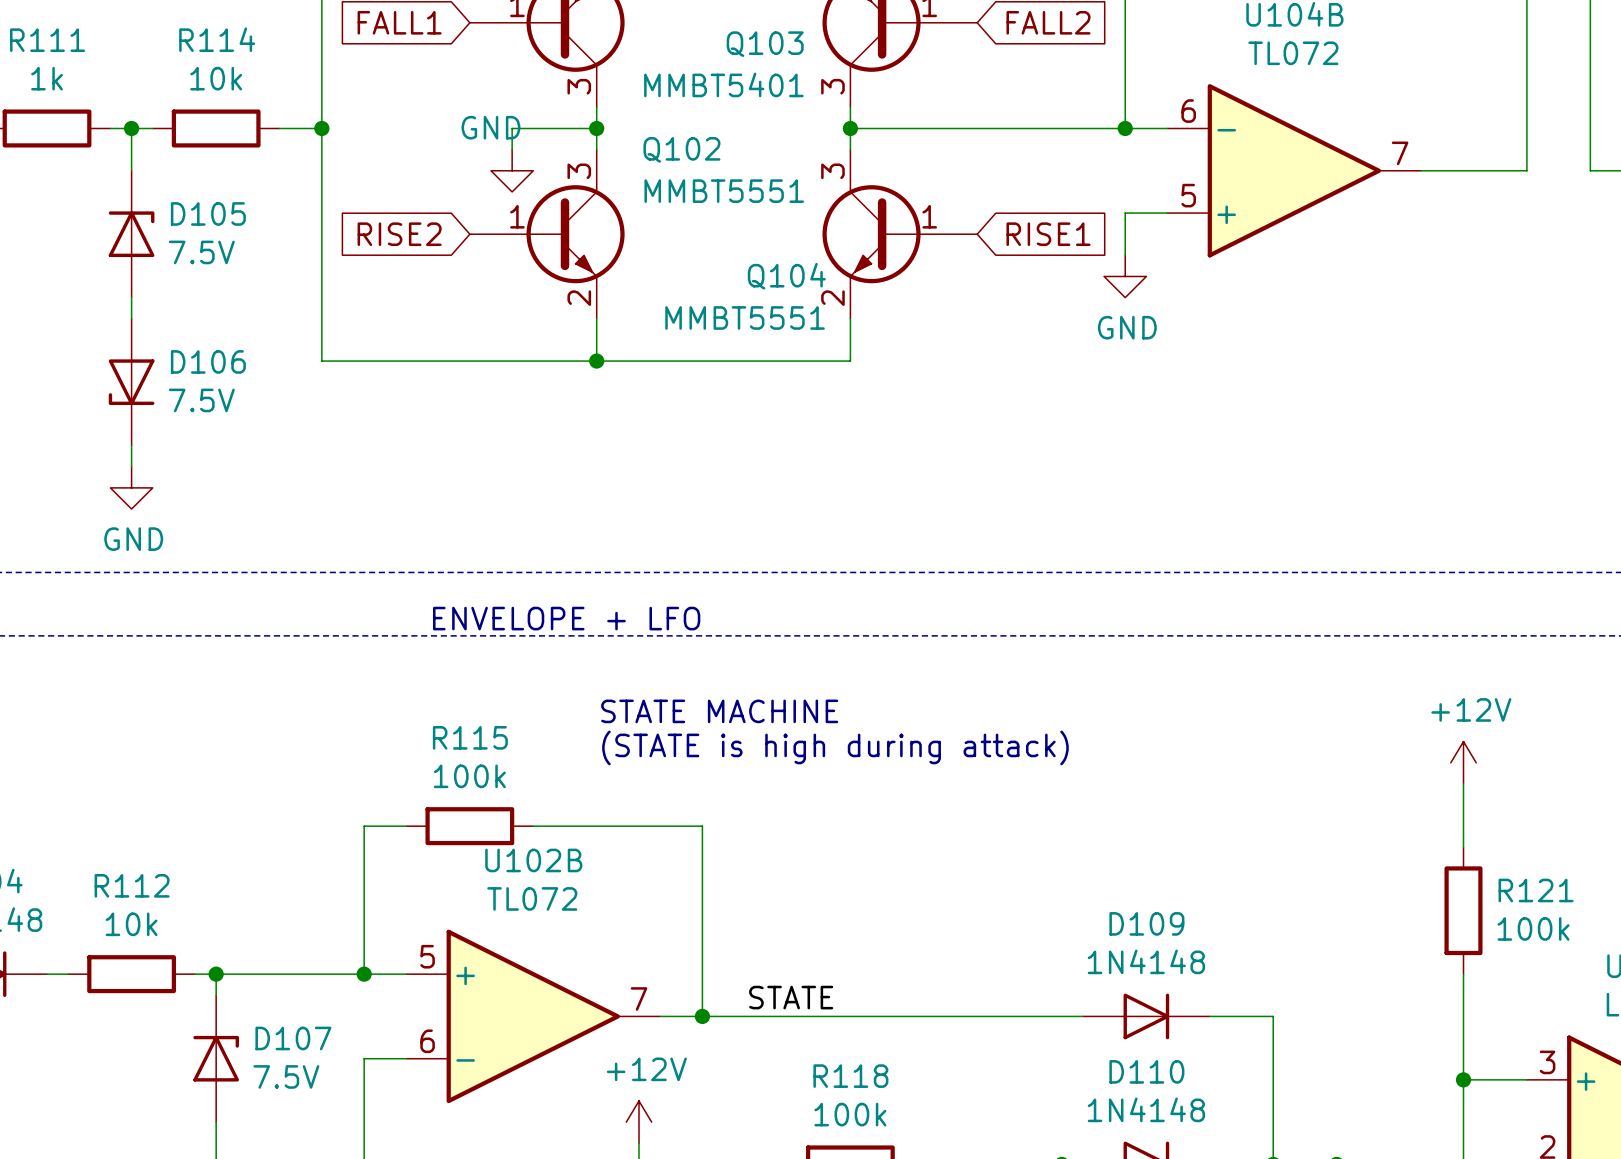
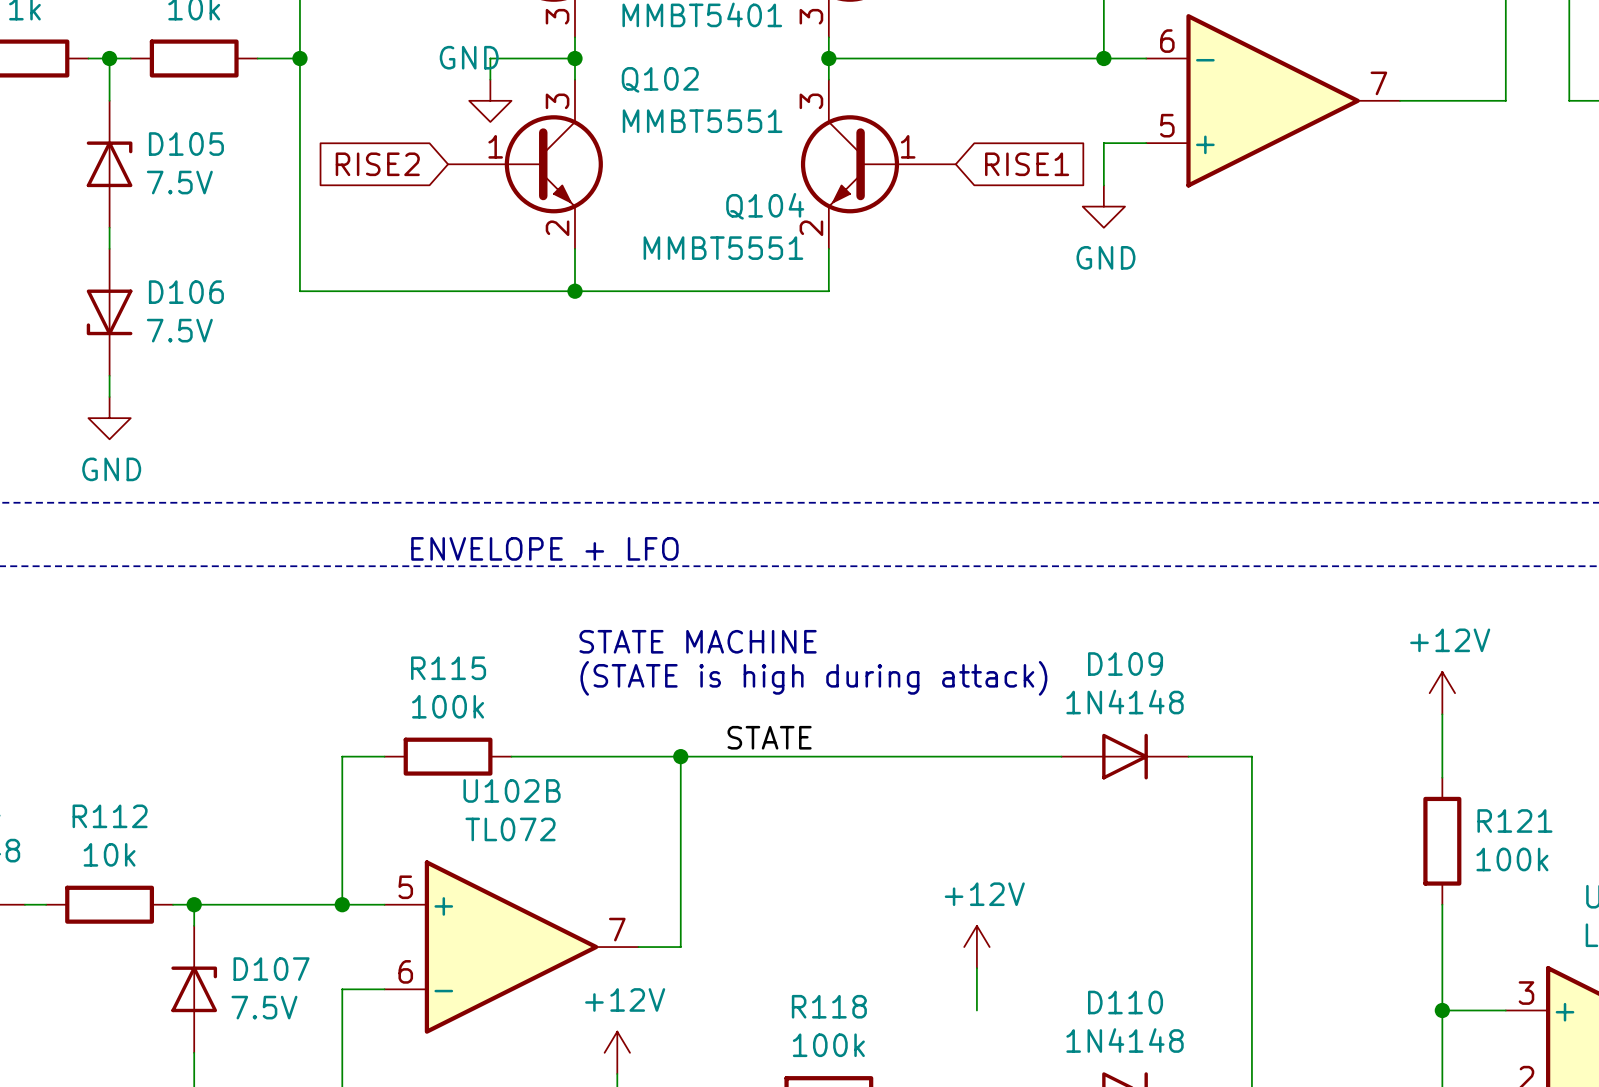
junction: none -> (680, 756)
label position: STATE (791, 997) -> STATE (769, 737)
wire: (702, 1016) (1082, 1016) -> (680, 756) (1061, 756)
junction: (702, 1016) -> none
power symbol: none -> +12V (976, 947)
D109 position: (1146, 1016) -> (1125, 756)
wire: (1209, 1016) (1273, 1016) -> (1188, 756) (1251, 756) (1251, 947)
wire: none -> (976, 968) (976, 1010)

